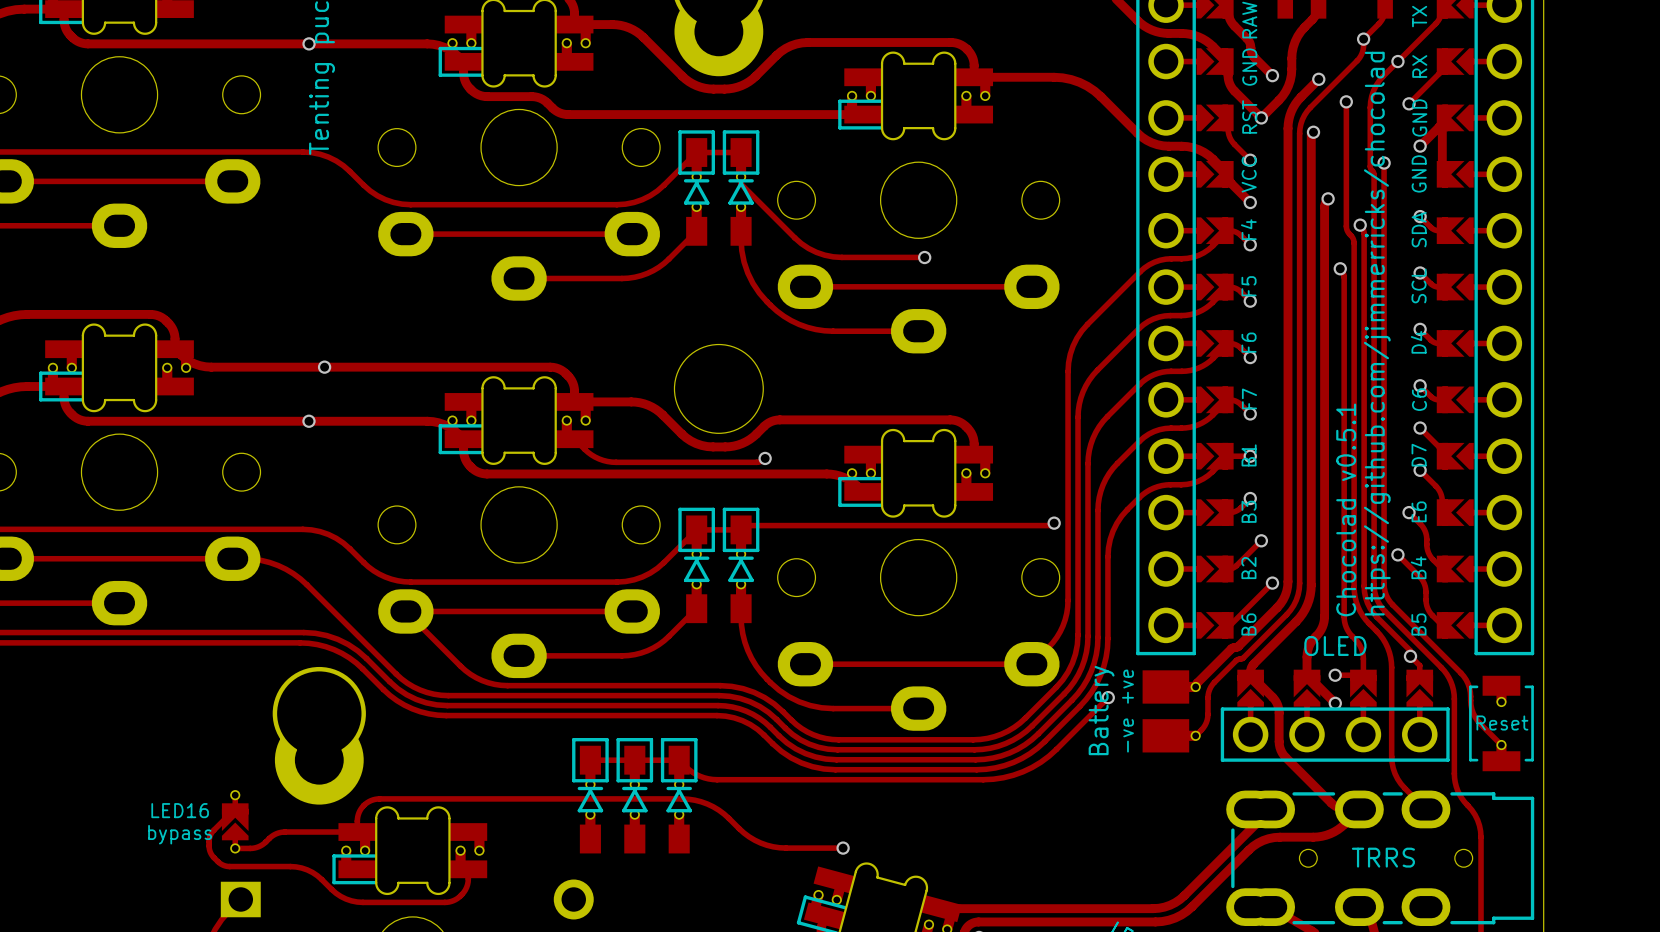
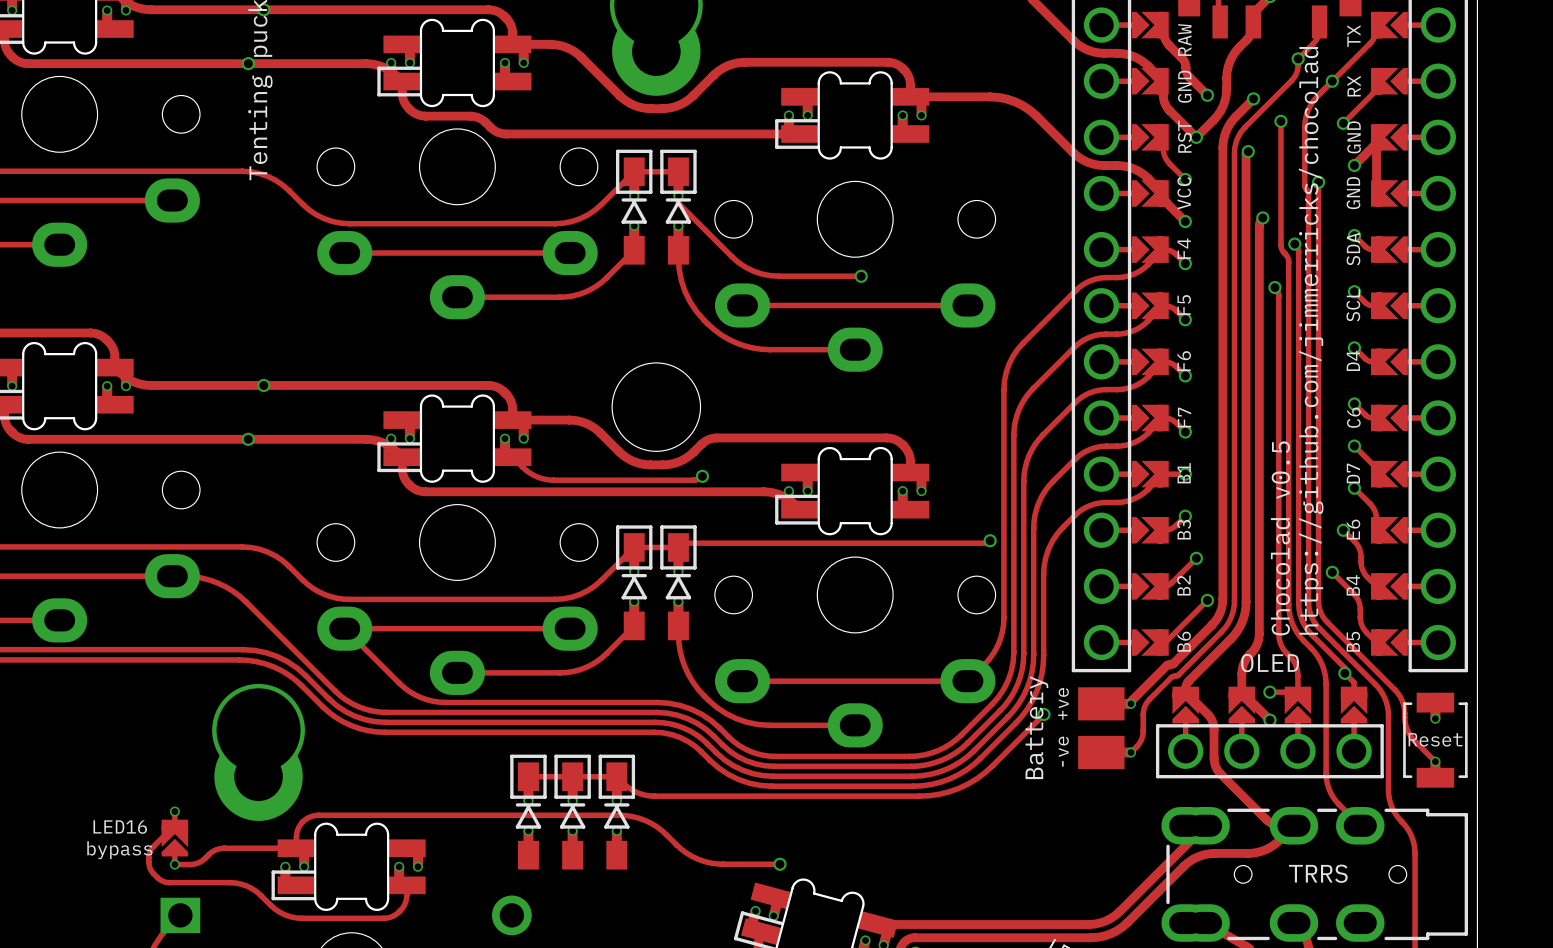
text: Chocolad v0.5.1 (1346, 509) -> Chocolad v0.5 (1280, 538)

